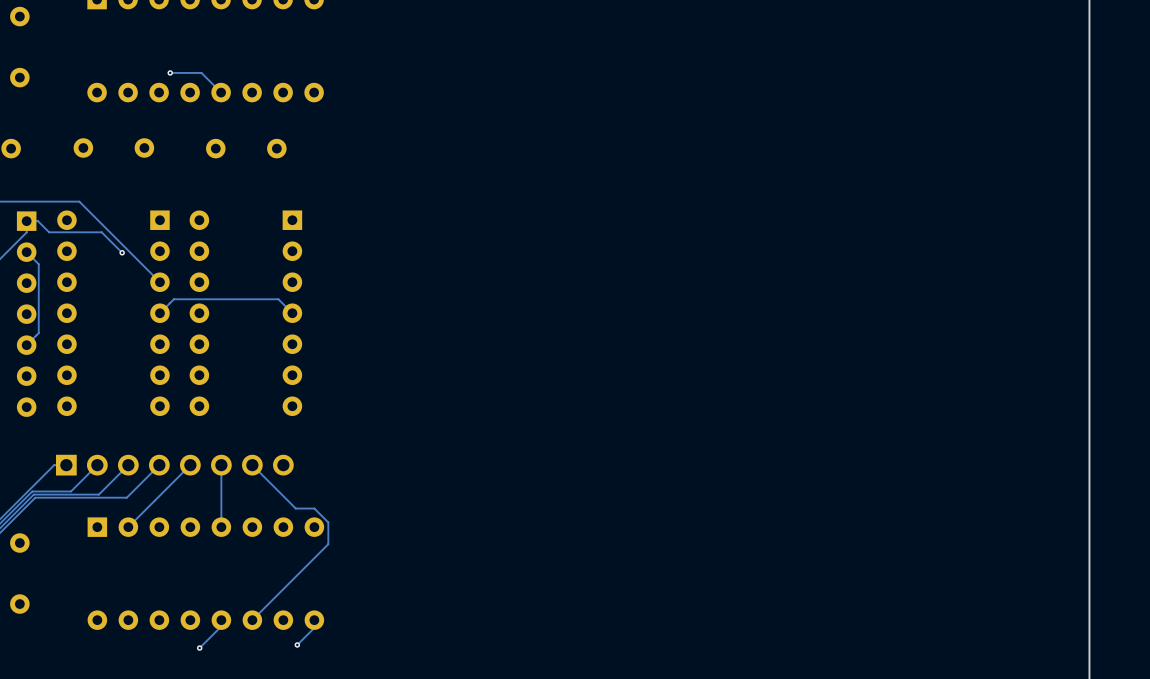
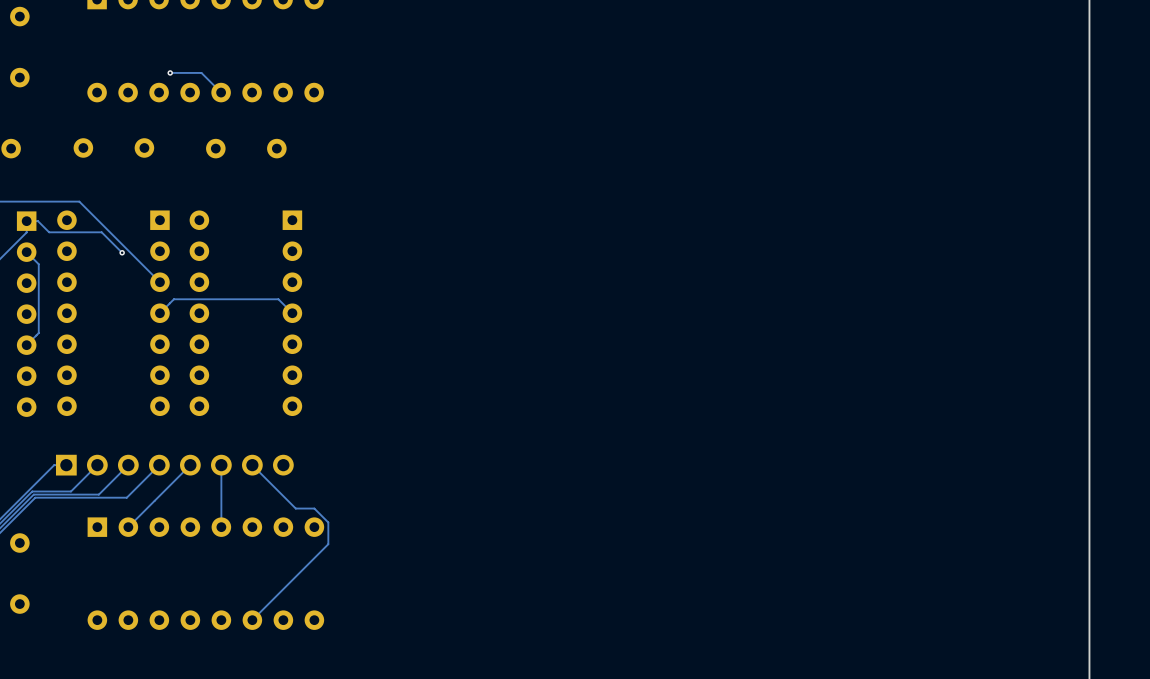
track: (221, 620) (221, 626) (199, 648) -> none
track: (314, 620) (314, 627) (297, 644) -> none
via: (297, 644) -> none
via: (199, 648) -> none

